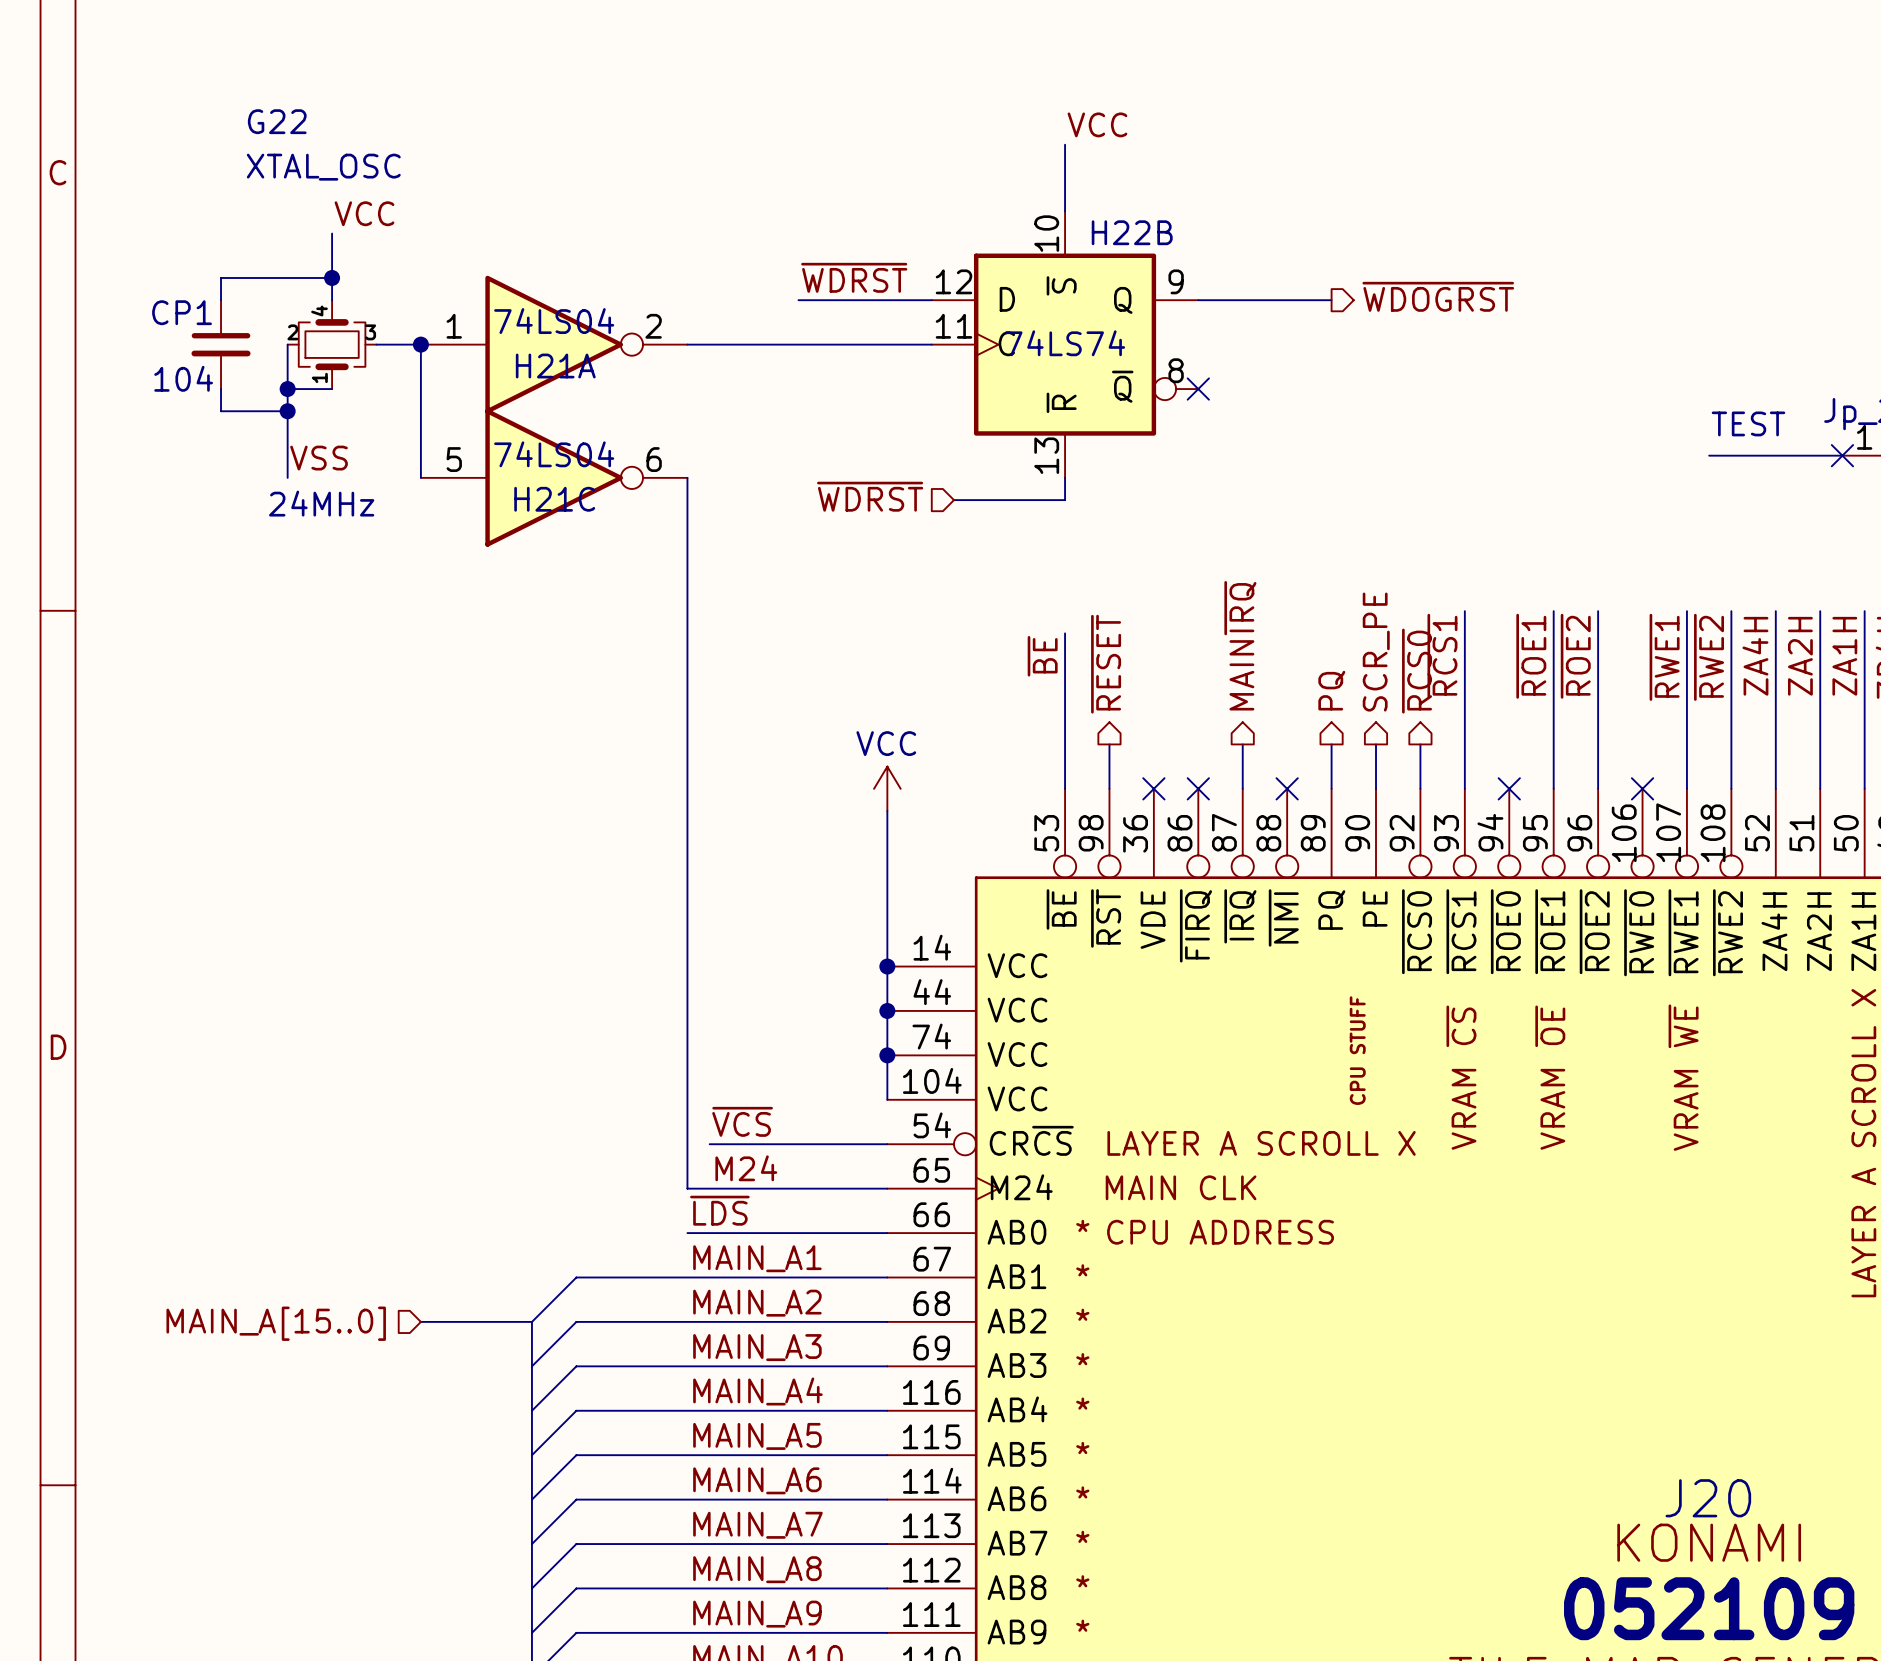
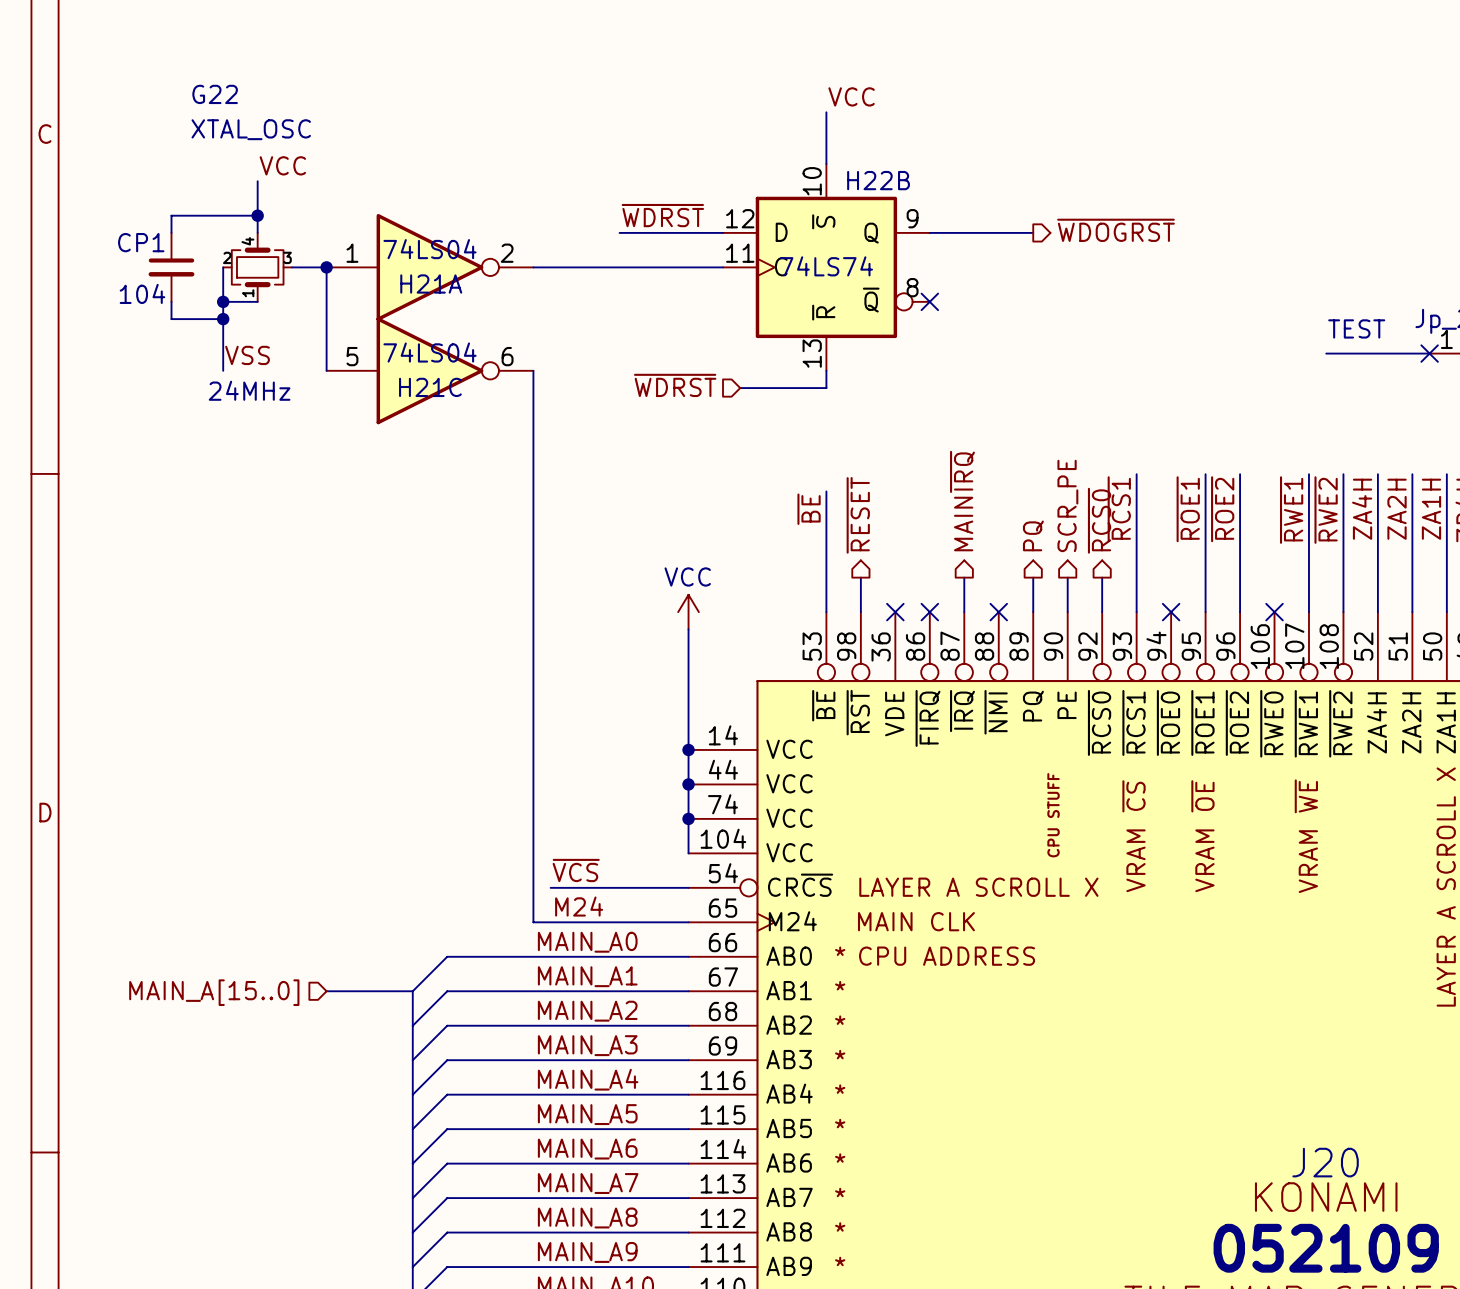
label: ~{LDS} (719, 1210) -> MAIN_A0 (587, 942)
wire: none -> (533, 956) (447, 956) (412, 991)
bus: (420, 1321) (531, 1321) -> (326, 991) (412, 991) (412, 1025)
hierarchical label position: MAIN_A[15..0] (276, 1323) -> MAIN_A[15..0] (214, 992)

